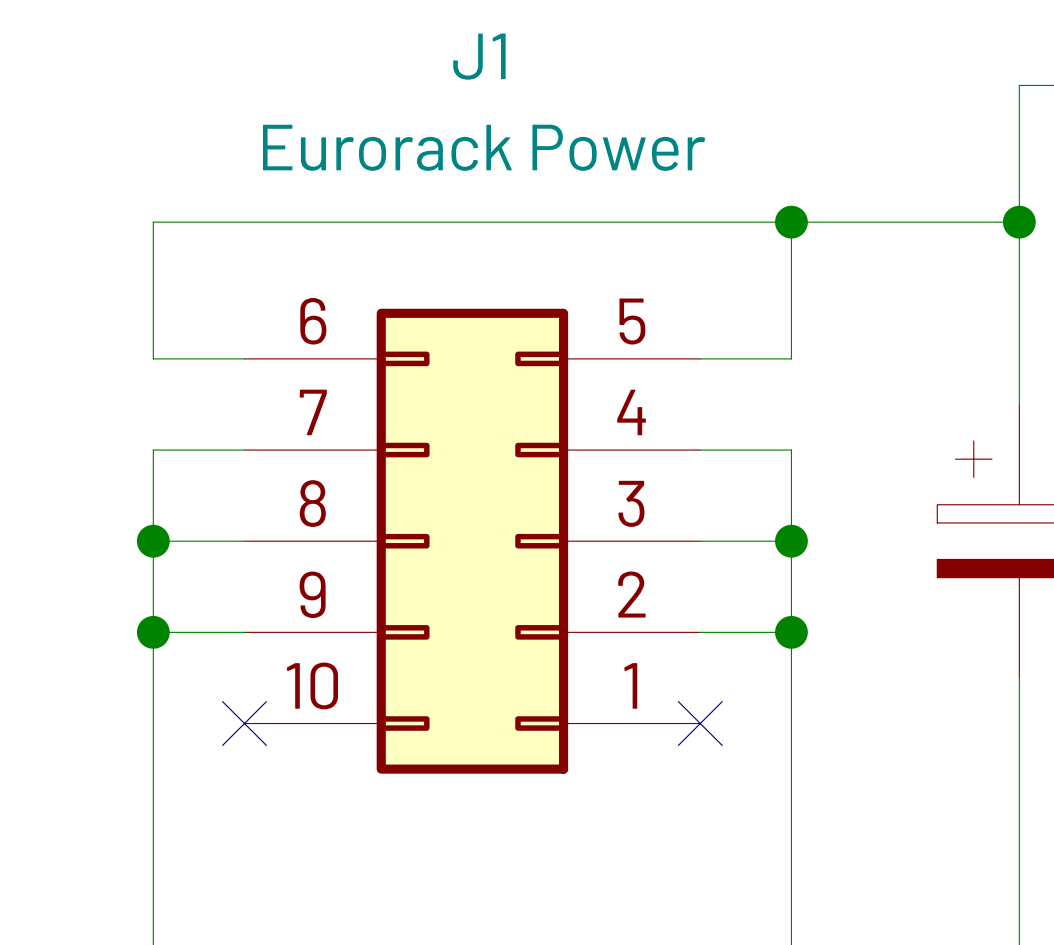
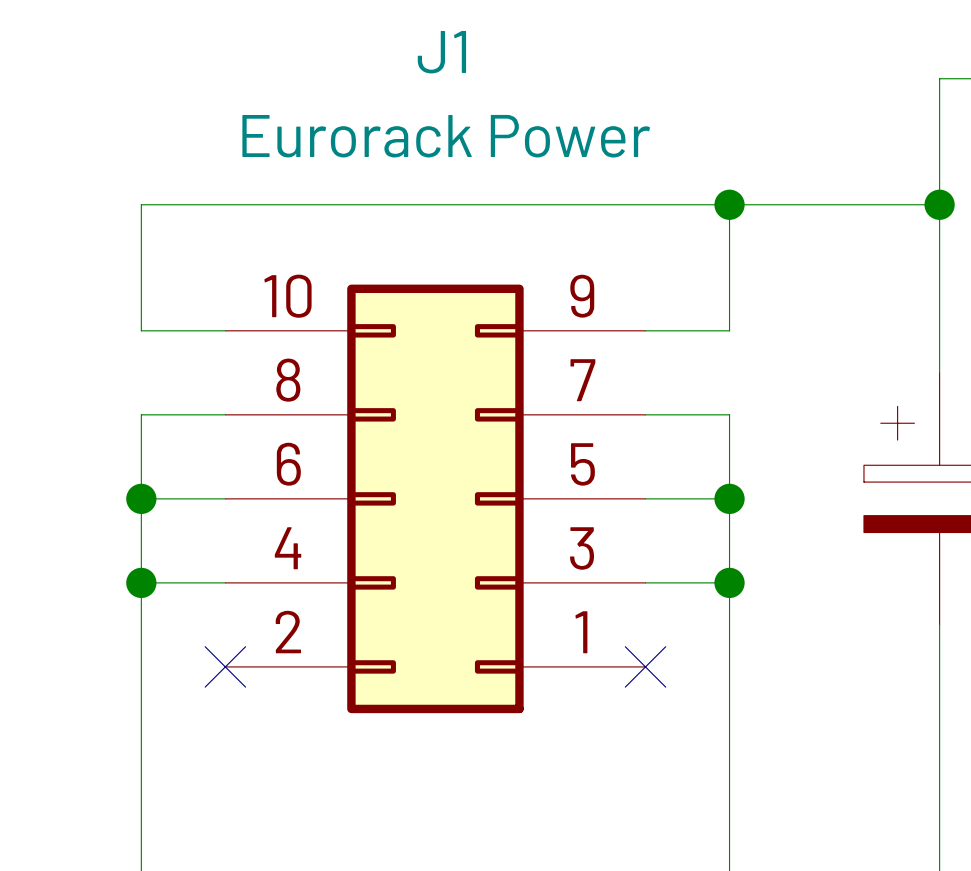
J1 symbol: [244, 308, 701, 774] -> [225, 284, 646, 714]

